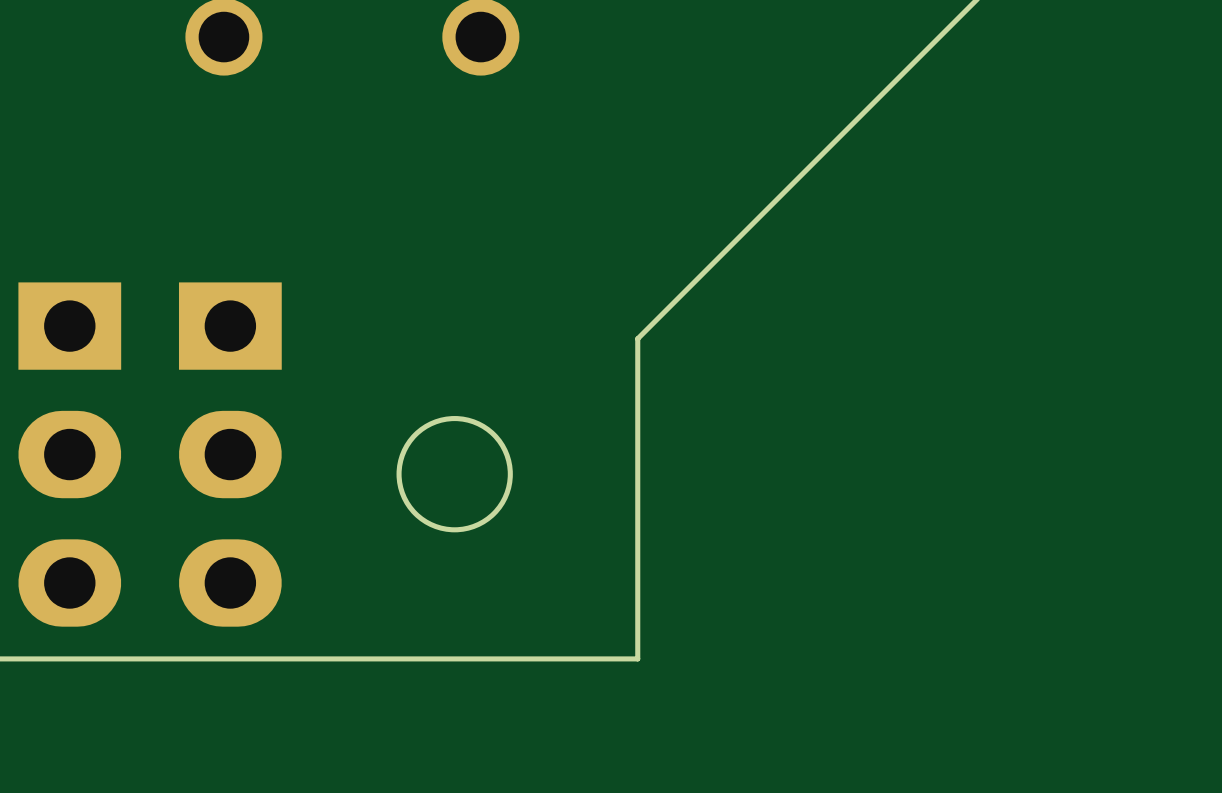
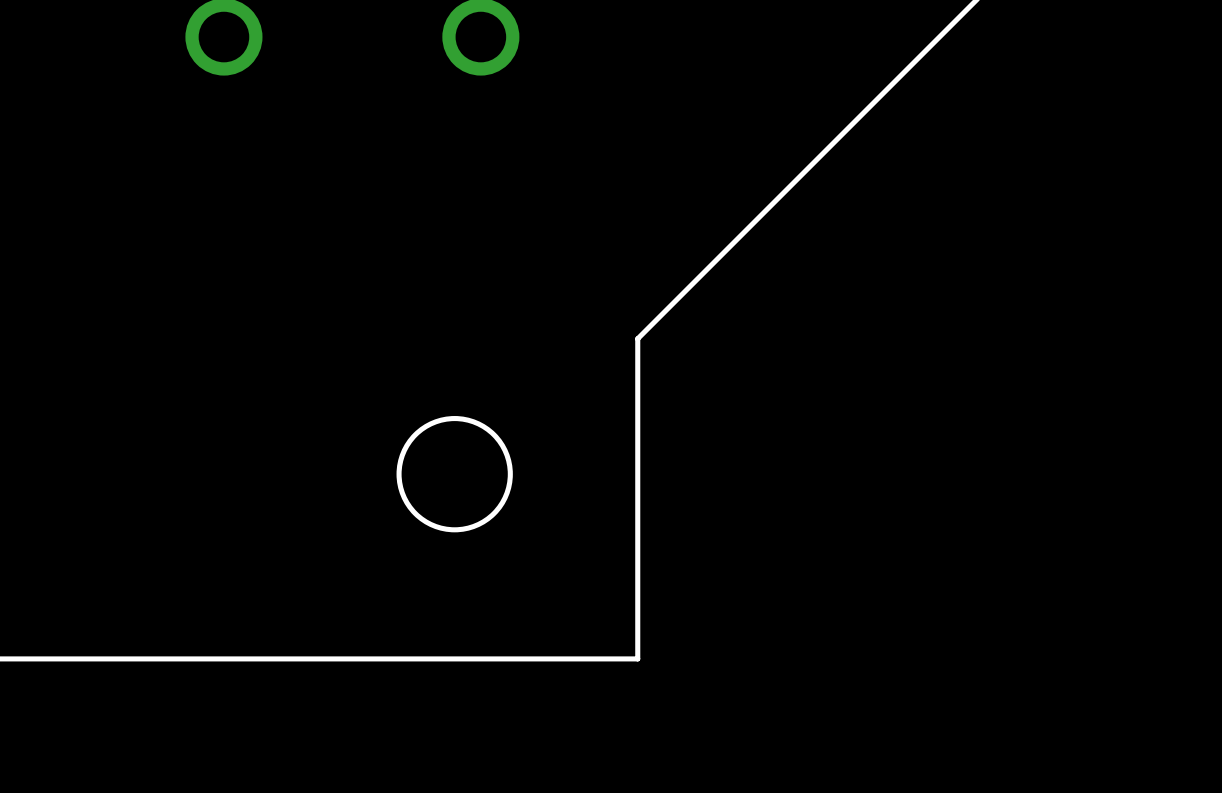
part: (69, 454) -> none
part: (230, 454) -> none

